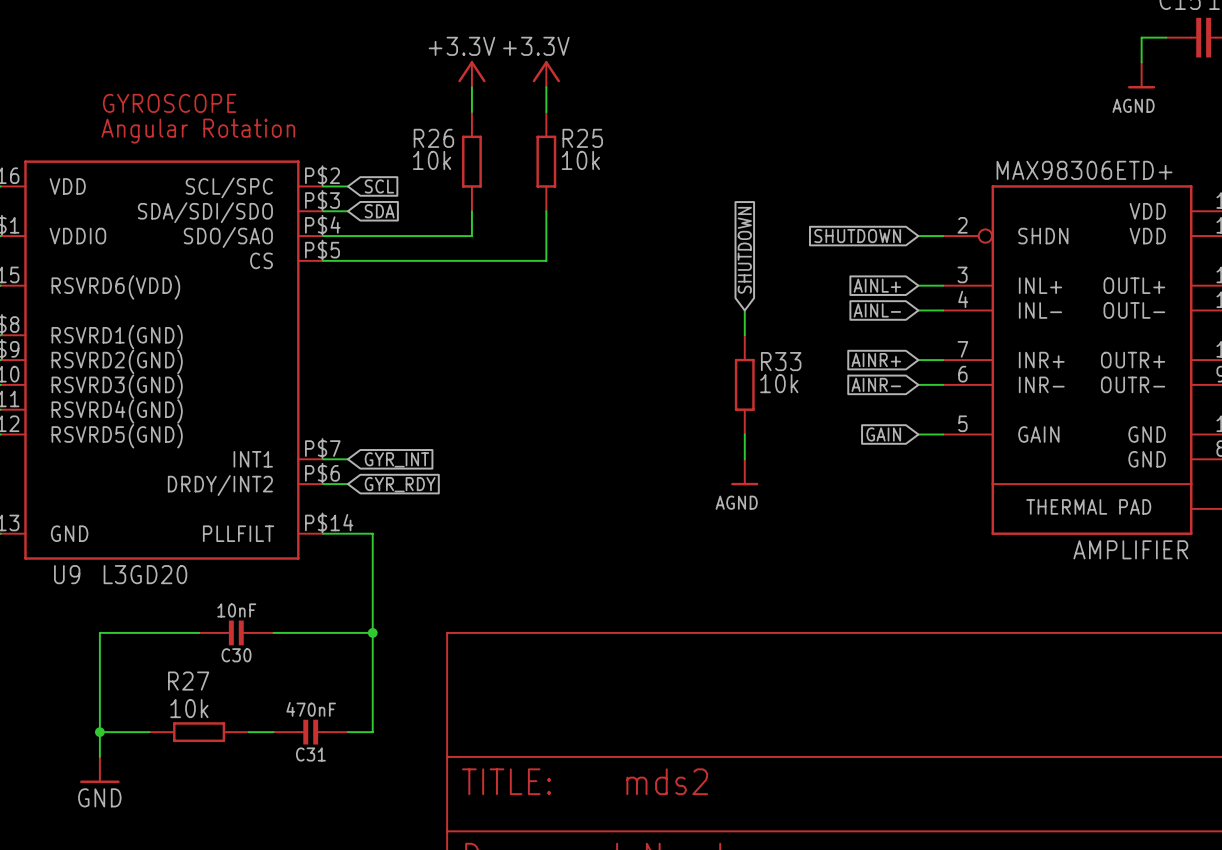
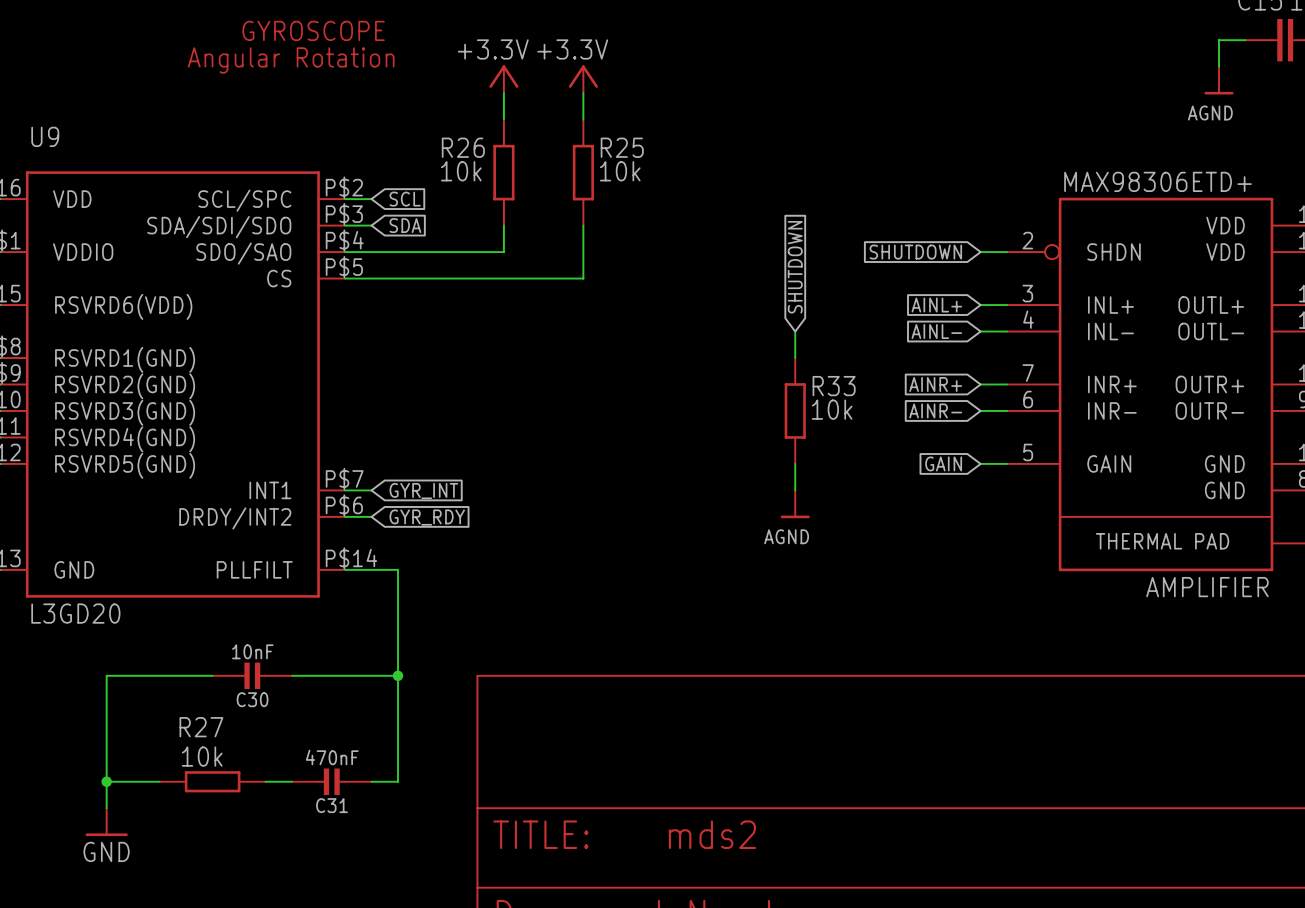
text position: GYROSCOPE (169, 103) -> GYROSCOPE (313, 30)
text position: Angular Rotation (198, 131) -> Angular Rotation (291, 60)
U9 name position: U9 (67, 574) -> U9 (45, 136)
U9 value position: L3GD20 (145, 574) -> L3GD20 (75, 613)

